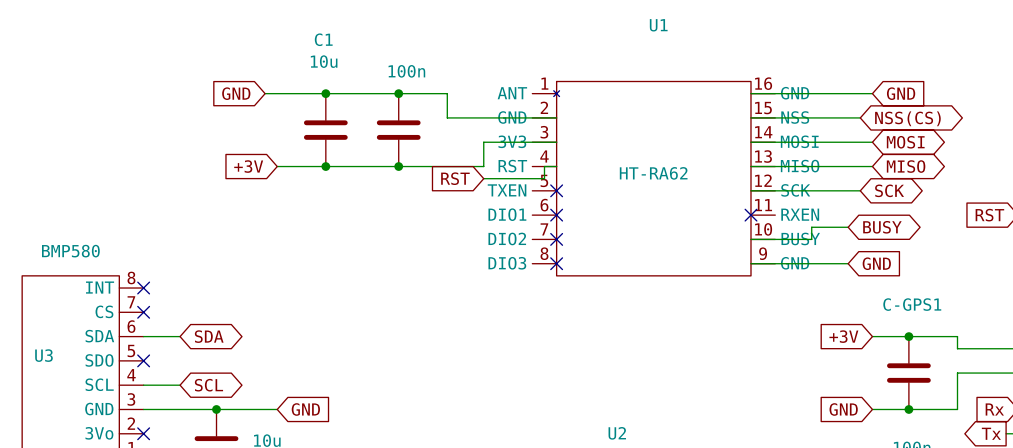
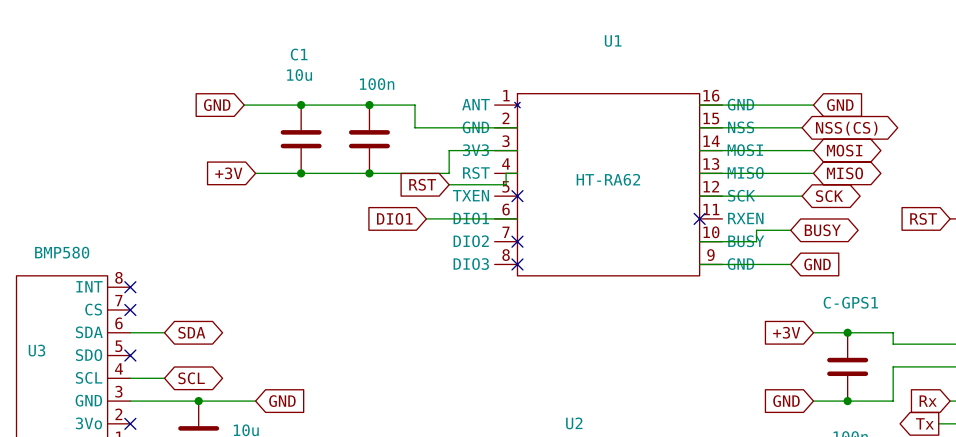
global label: none -> DIO1 (394, 218)
wire: none -> (426, 218) (517, 218)
no-connect mark: (556, 215) -> none

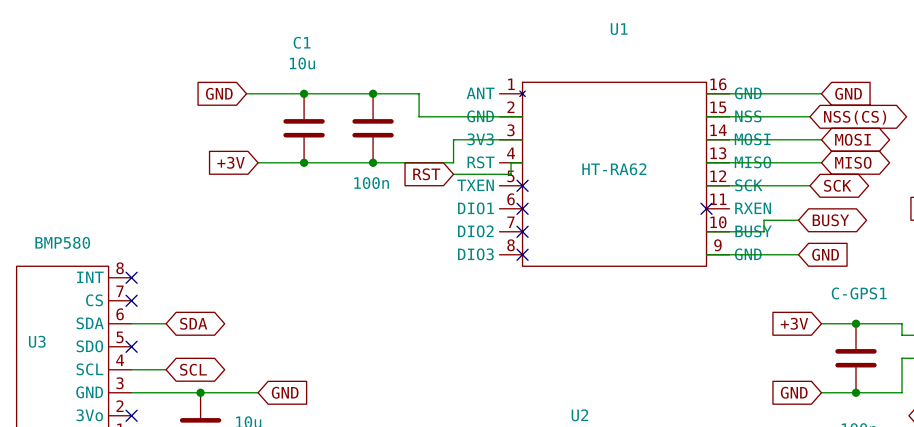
part value position: 100n (377, 84) -> 100n (371, 183)
global label: DIO1 (394, 218) -> none
wire: (426, 218) (517, 218) -> none
no-connect mark: none -> (522, 208)

